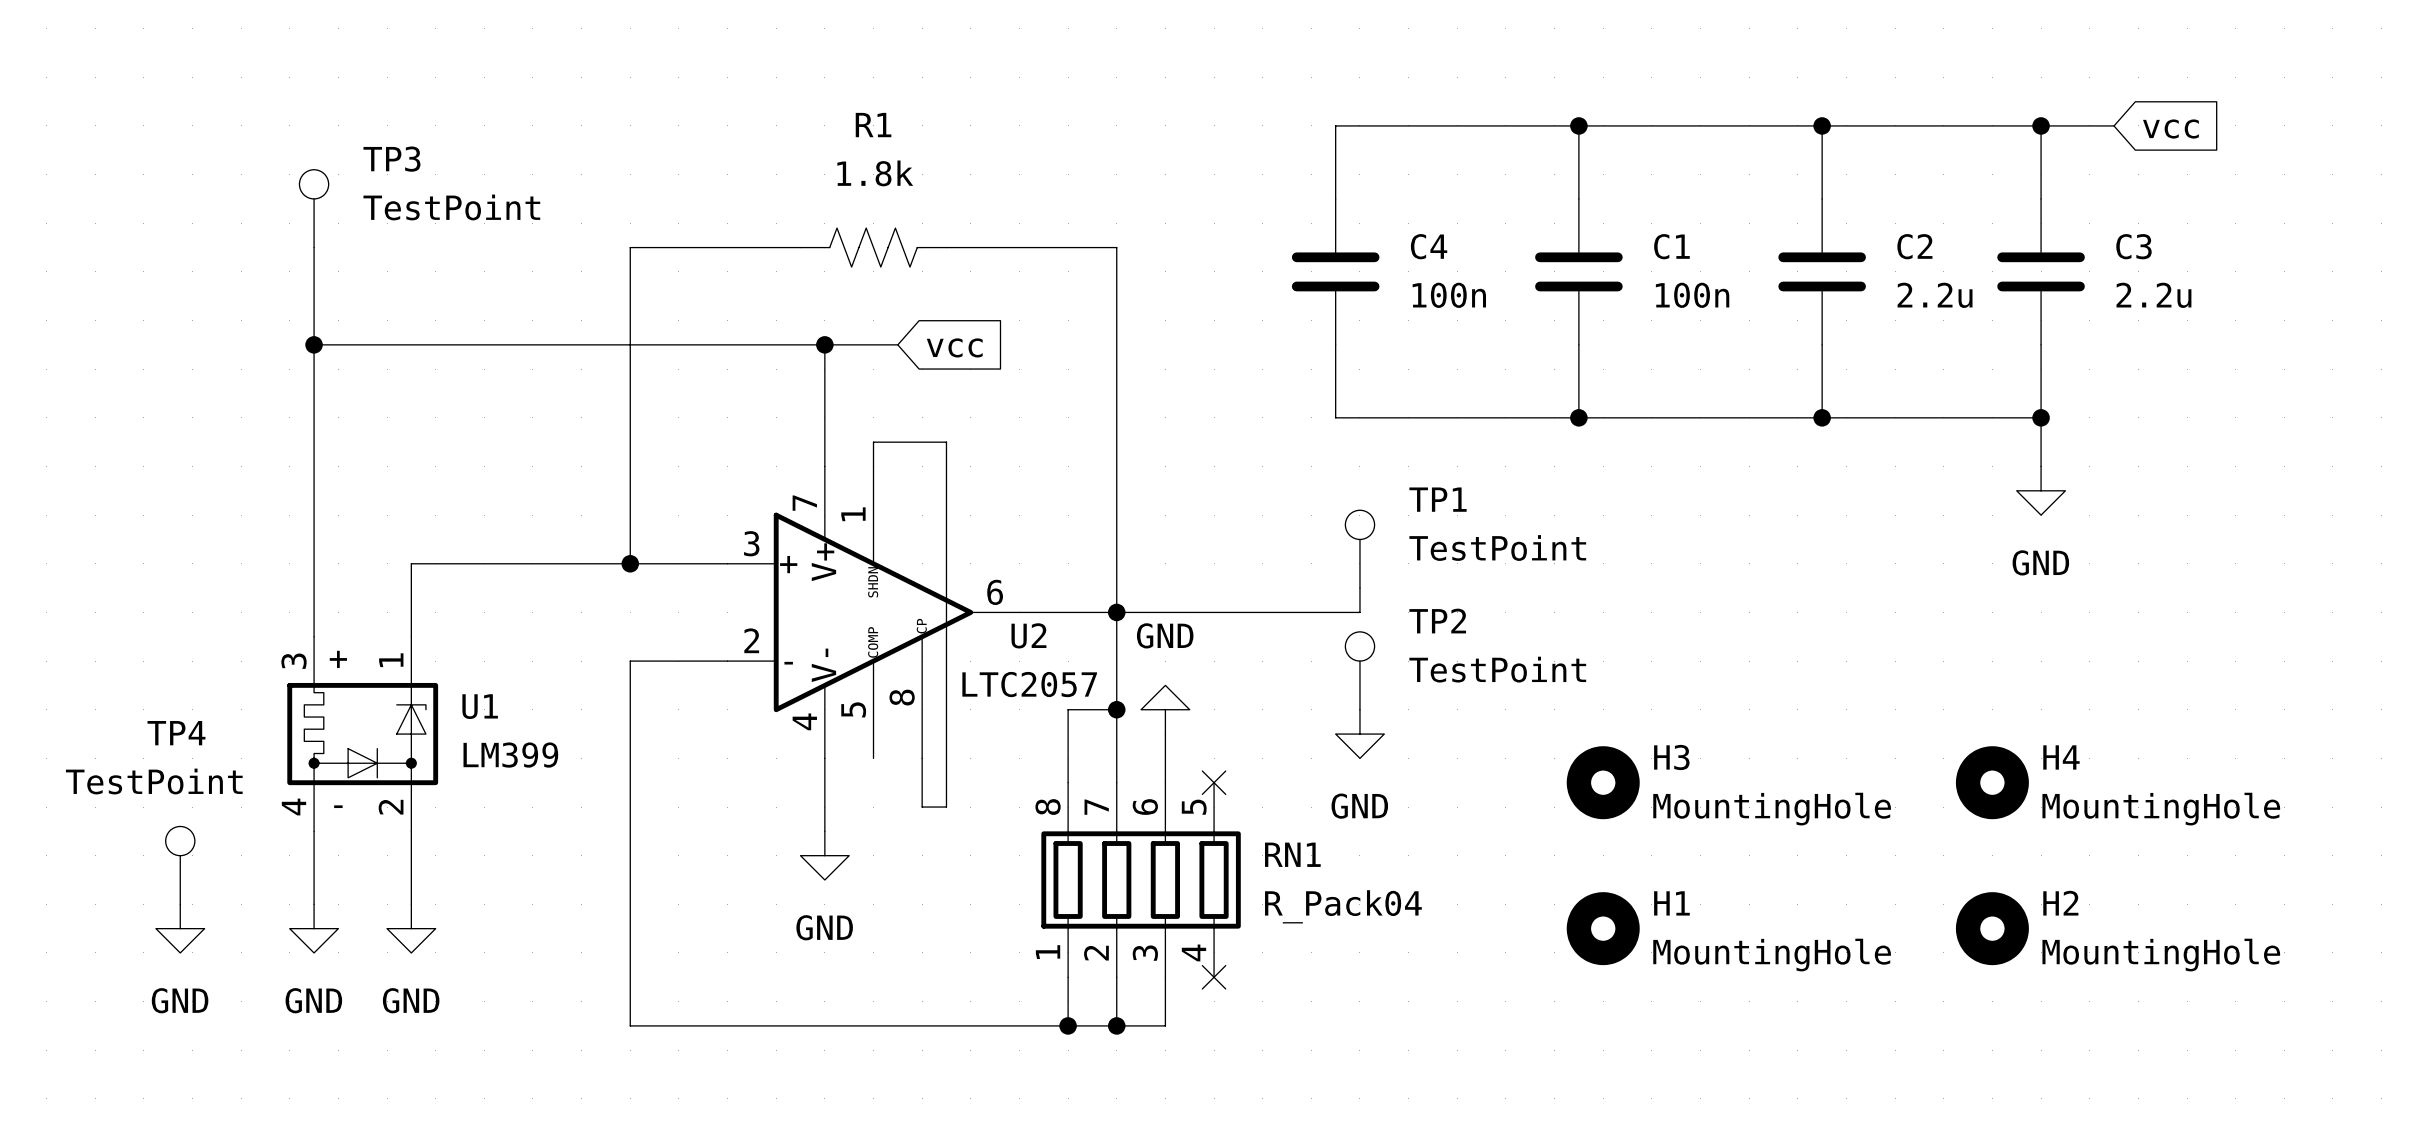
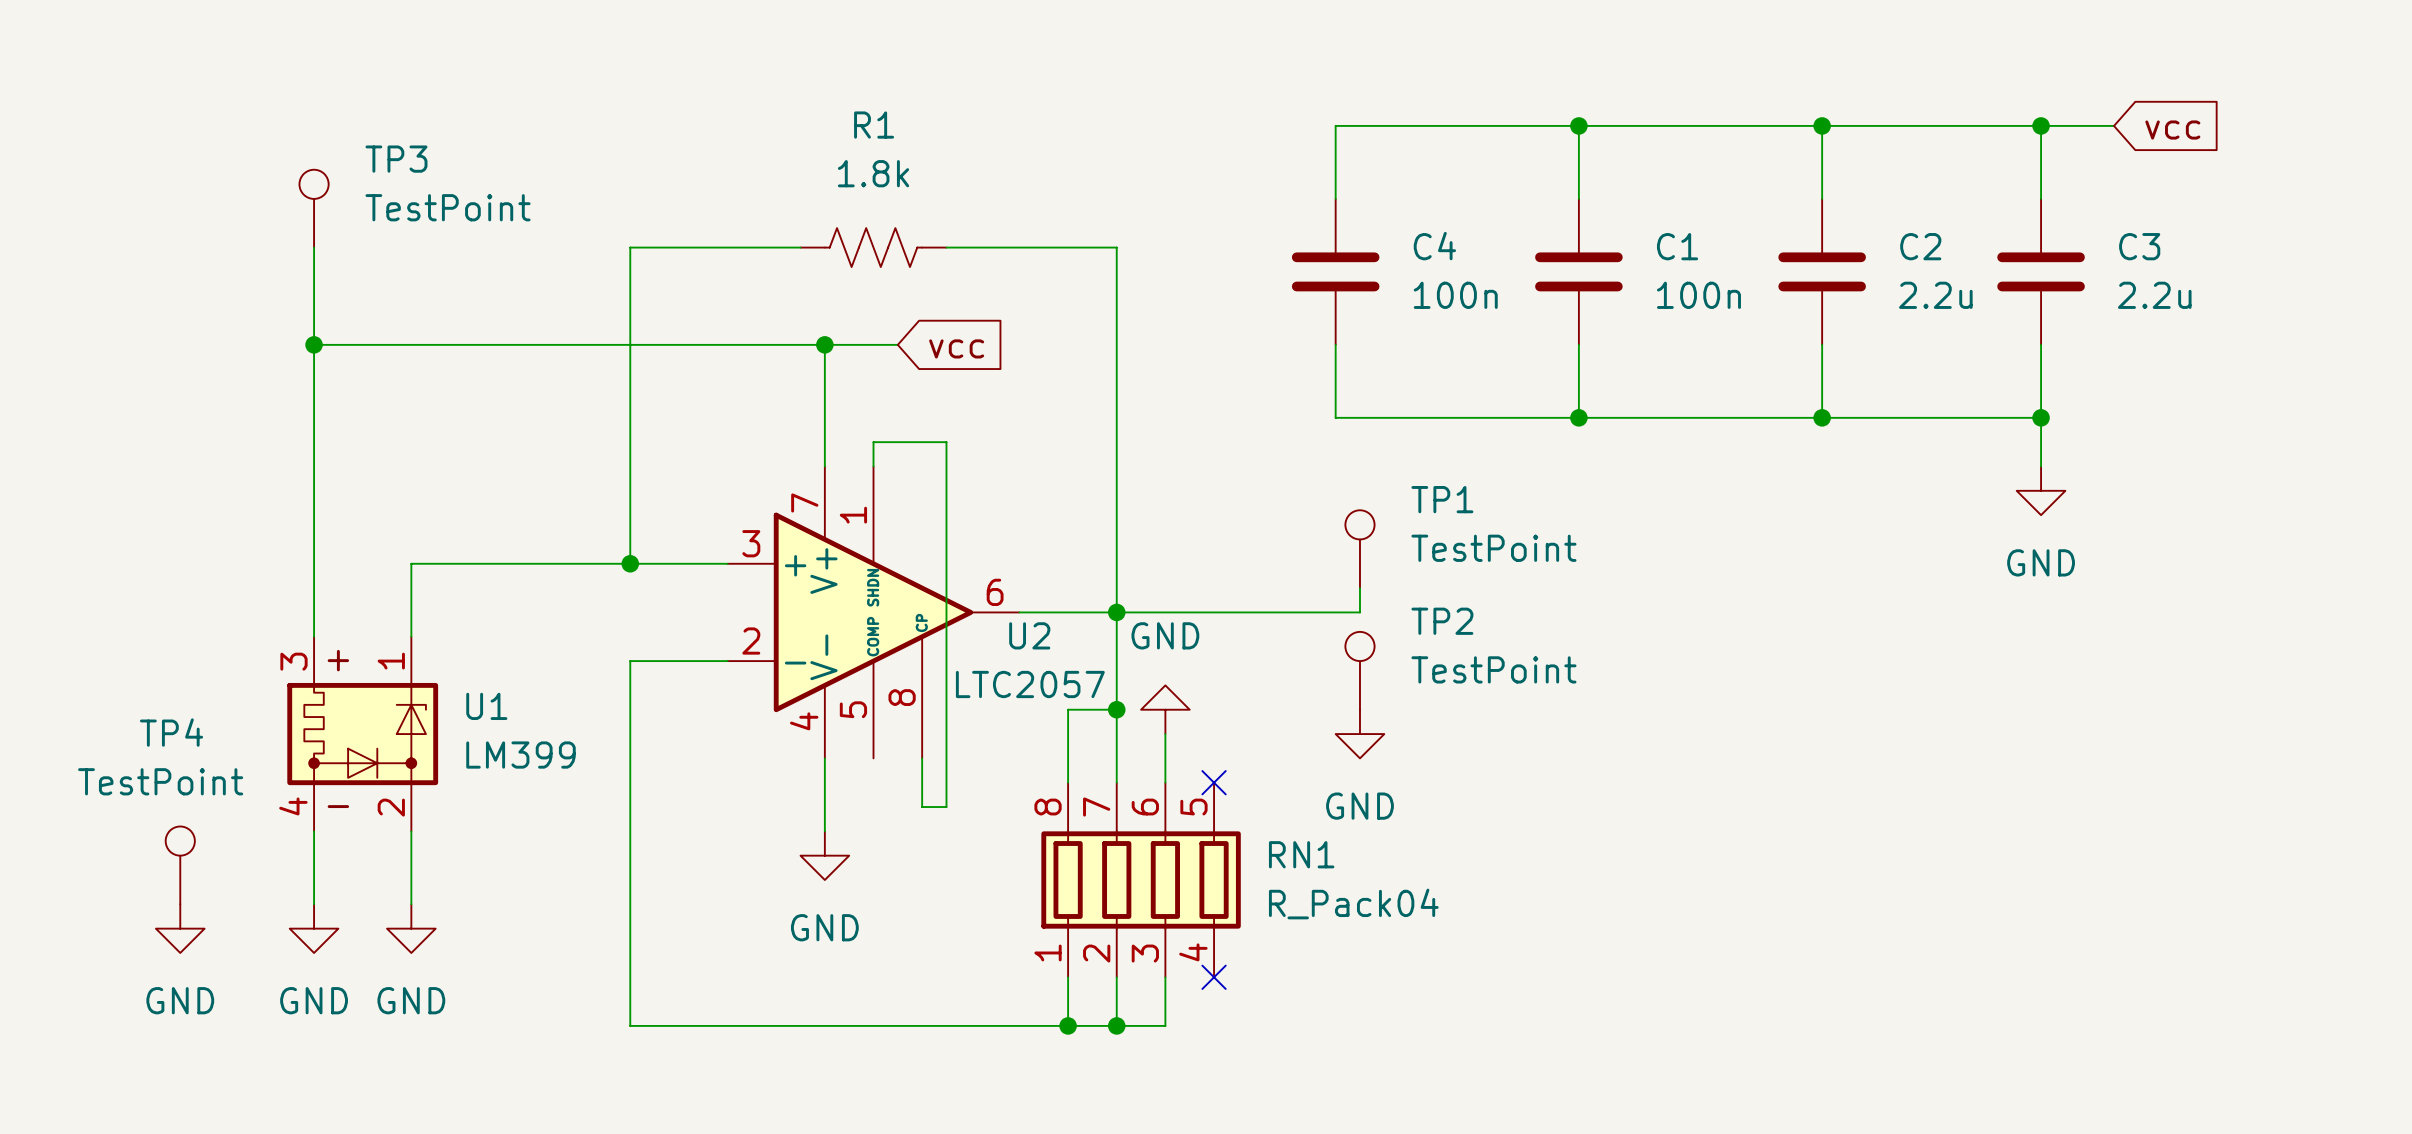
H3: MountingHole (1603, 782) -> none
H4: MountingHole (1992, 782) -> none
H1: MountingHole (1603, 928) -> none
H2: MountingHole (1992, 928) -> none

